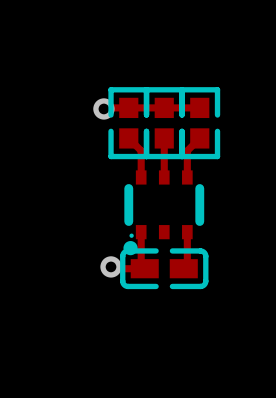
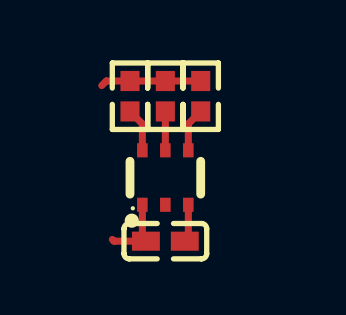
via: (103, 108) -> none
via: (111, 266) -> none

